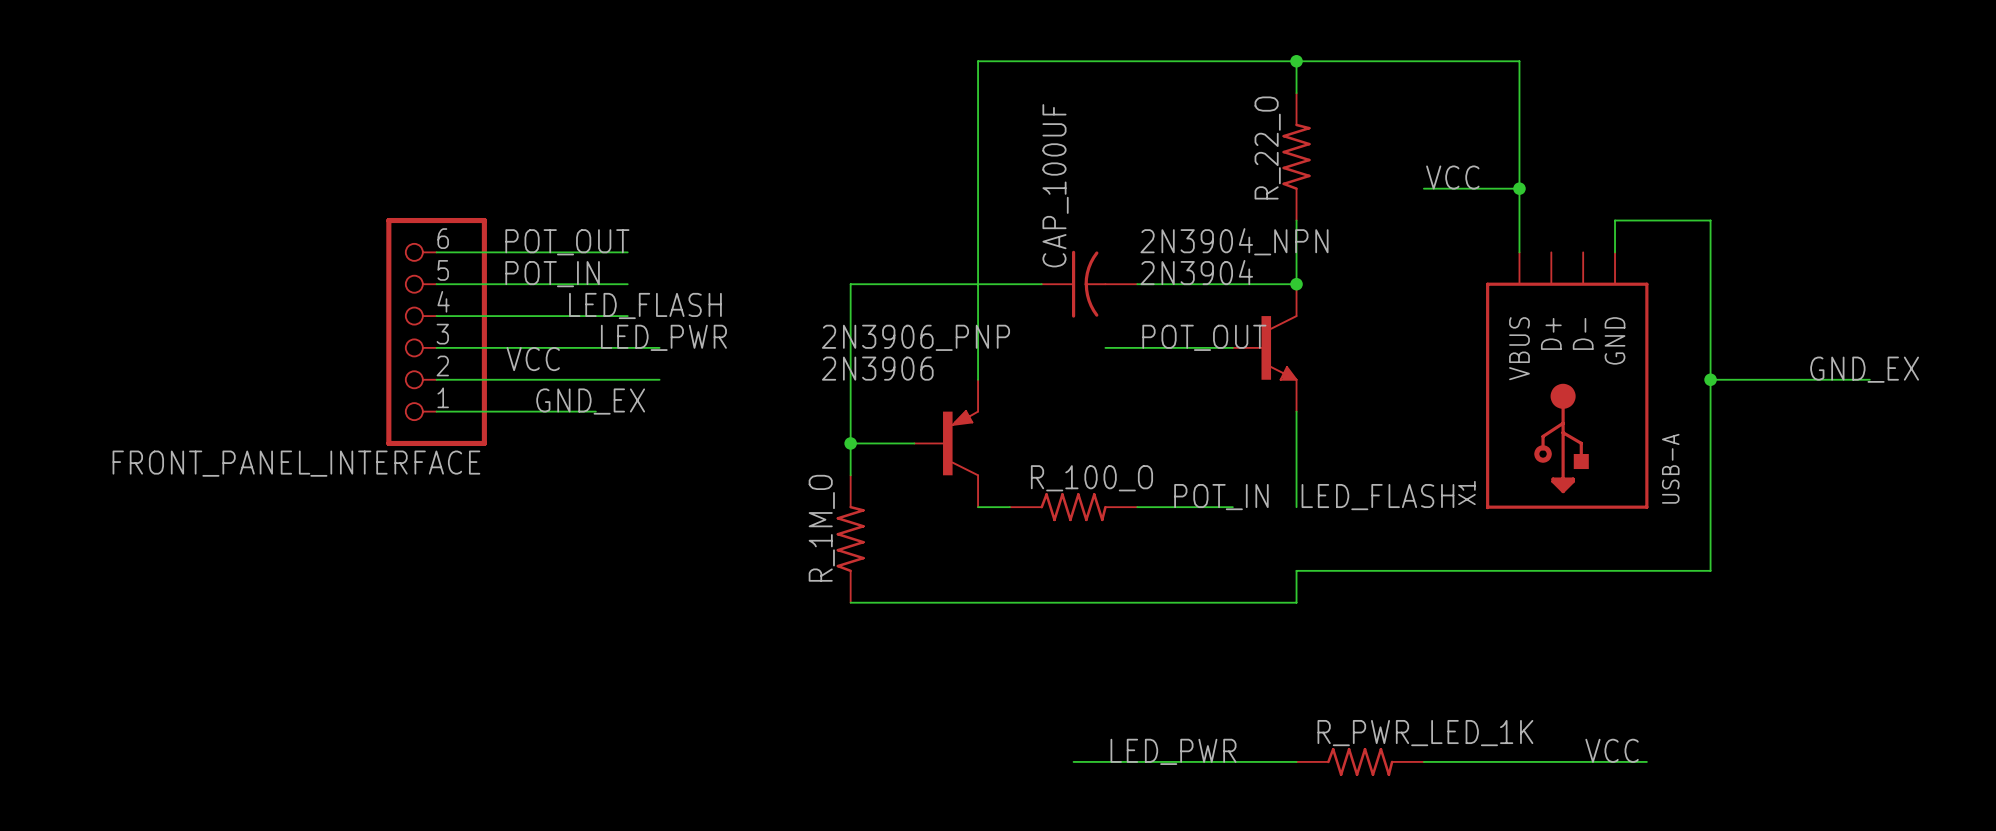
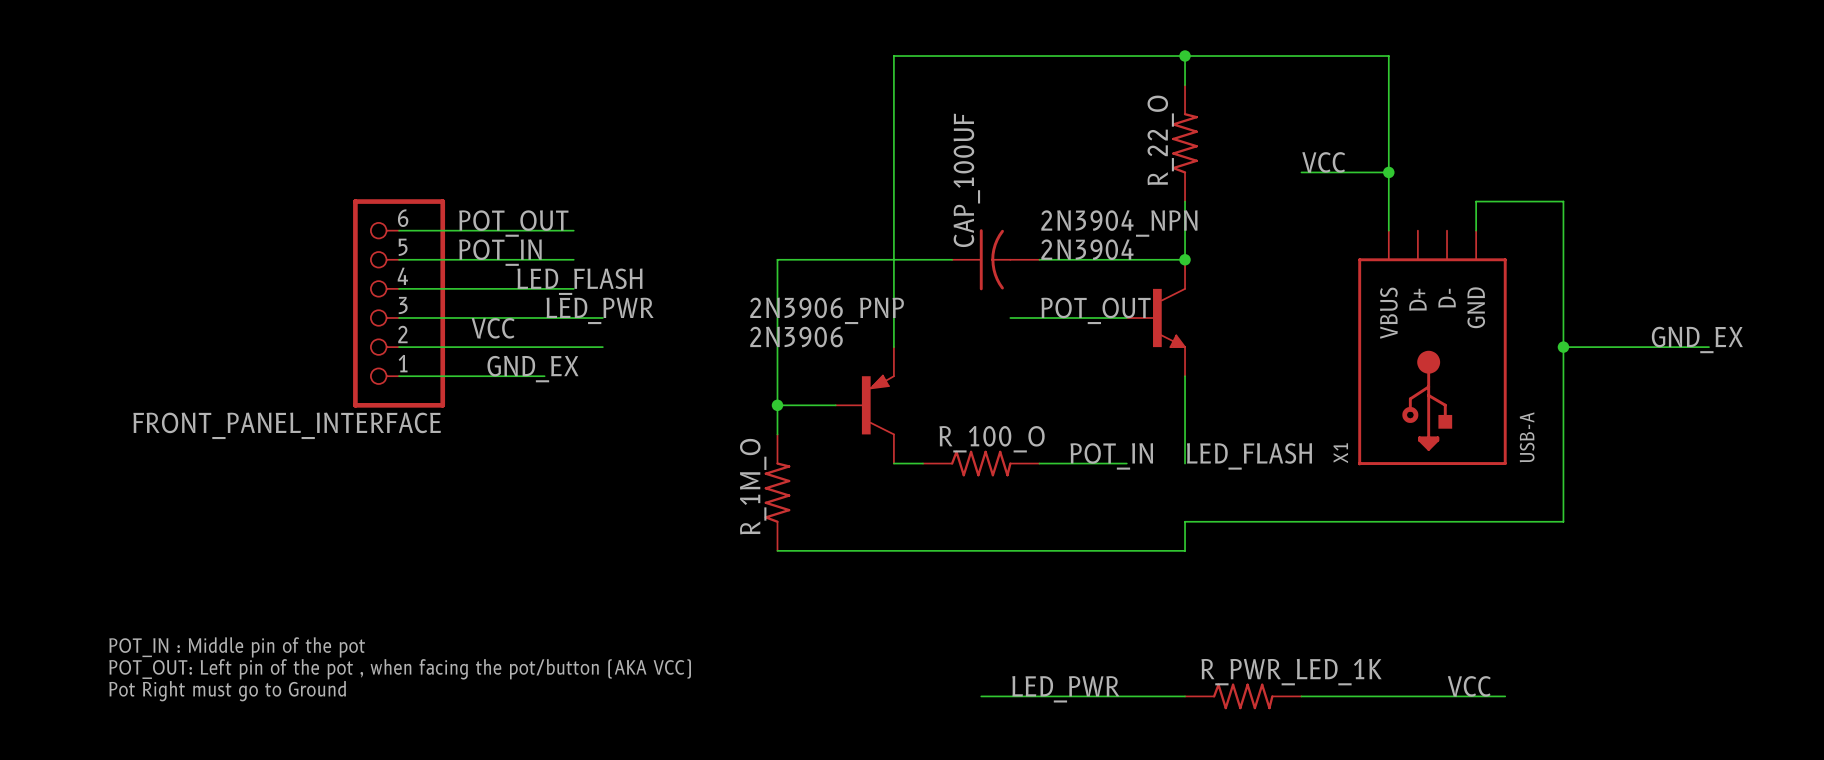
text: none -> POT_IN : Middle pin of the pot (237, 647)
text: none -> POT_OUT: Left pin of the pot , when facing the pot/button (AKA VCC) (400, 669)
text: none -> Pot Right must go to Ground (227, 691)

